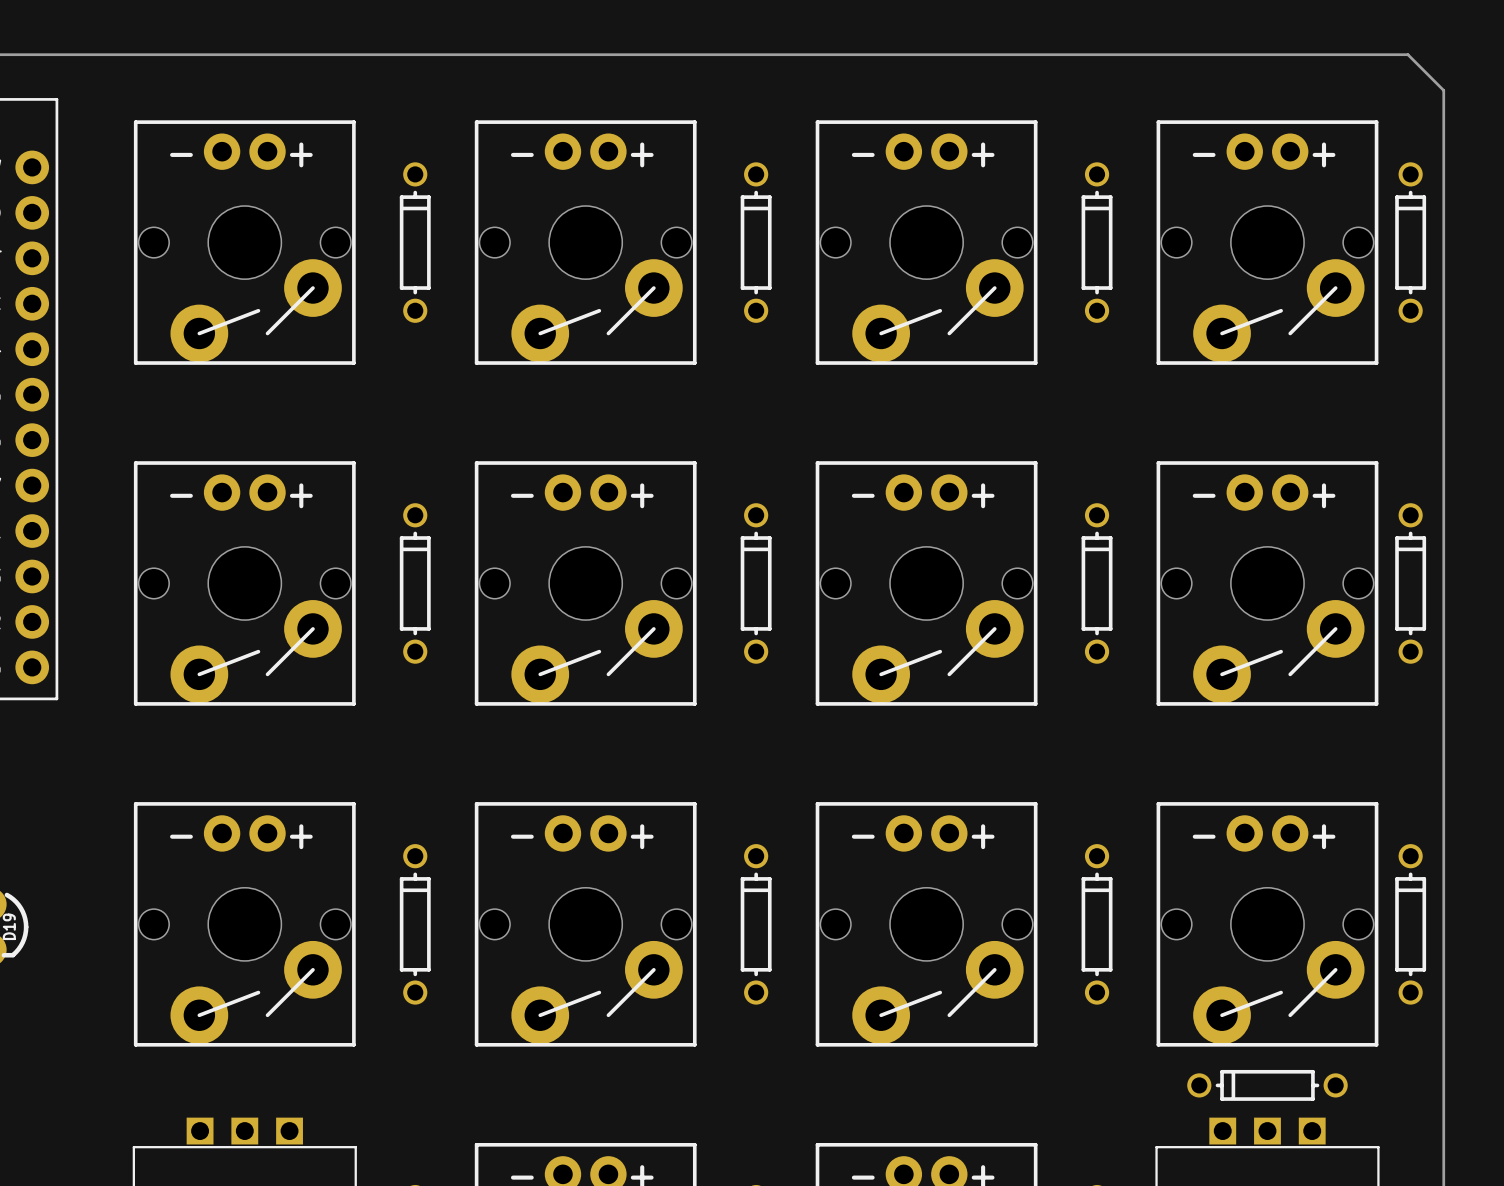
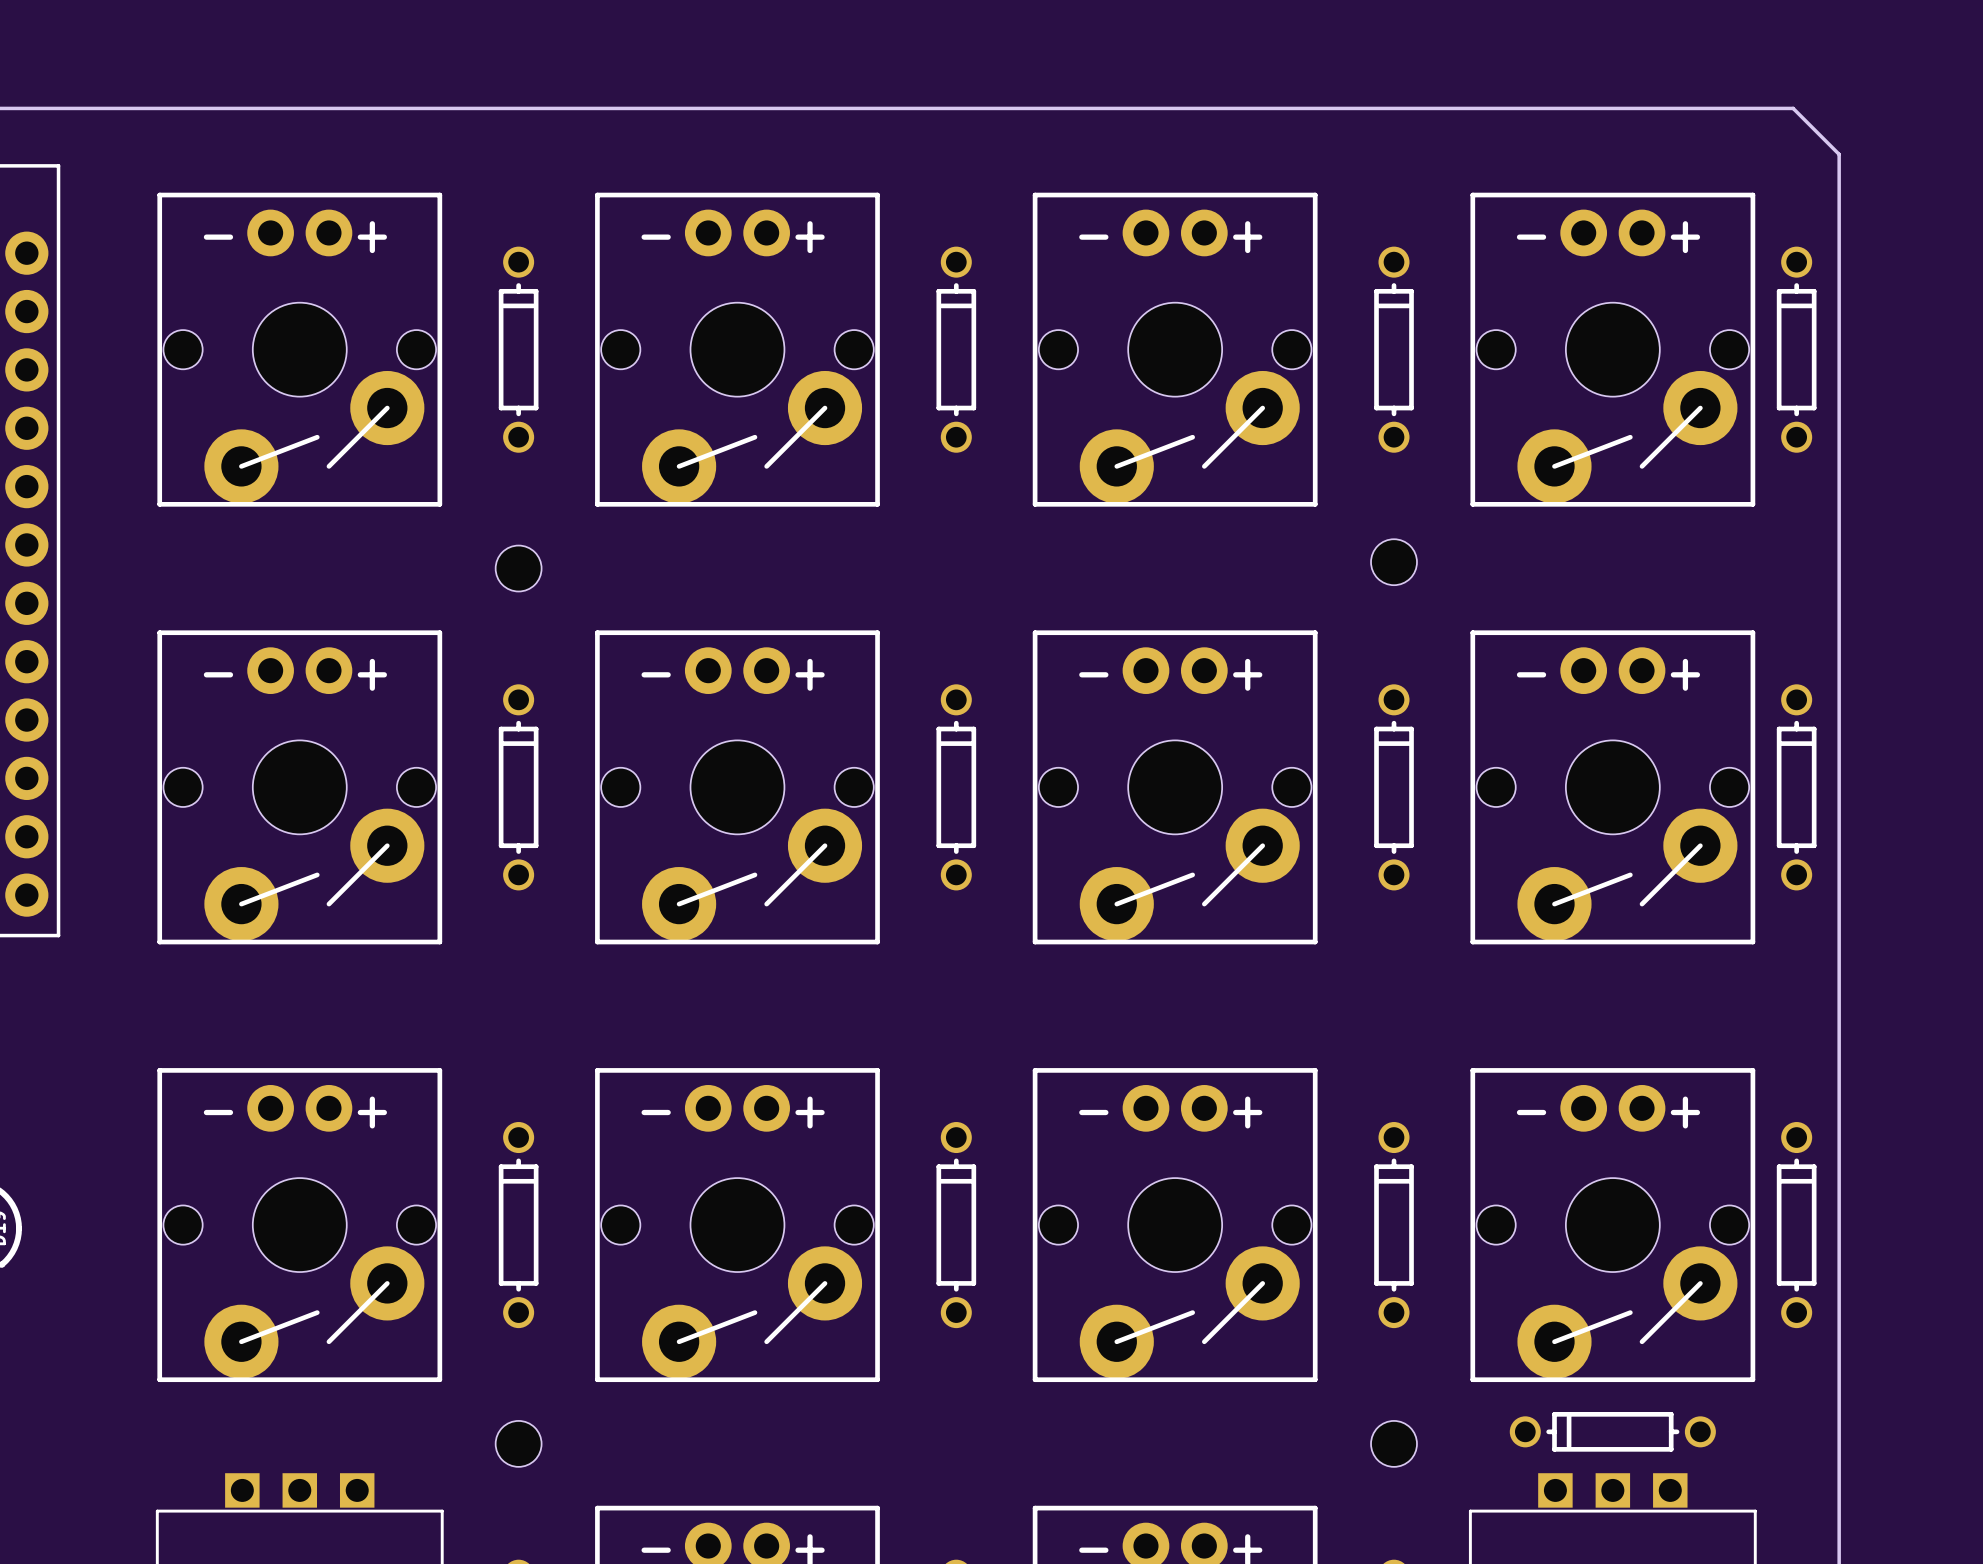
hole: none -> (1394, 562)
hole: none -> (518, 568)
hole: none -> (518, 1443)
hole: none -> (1394, 1443)

